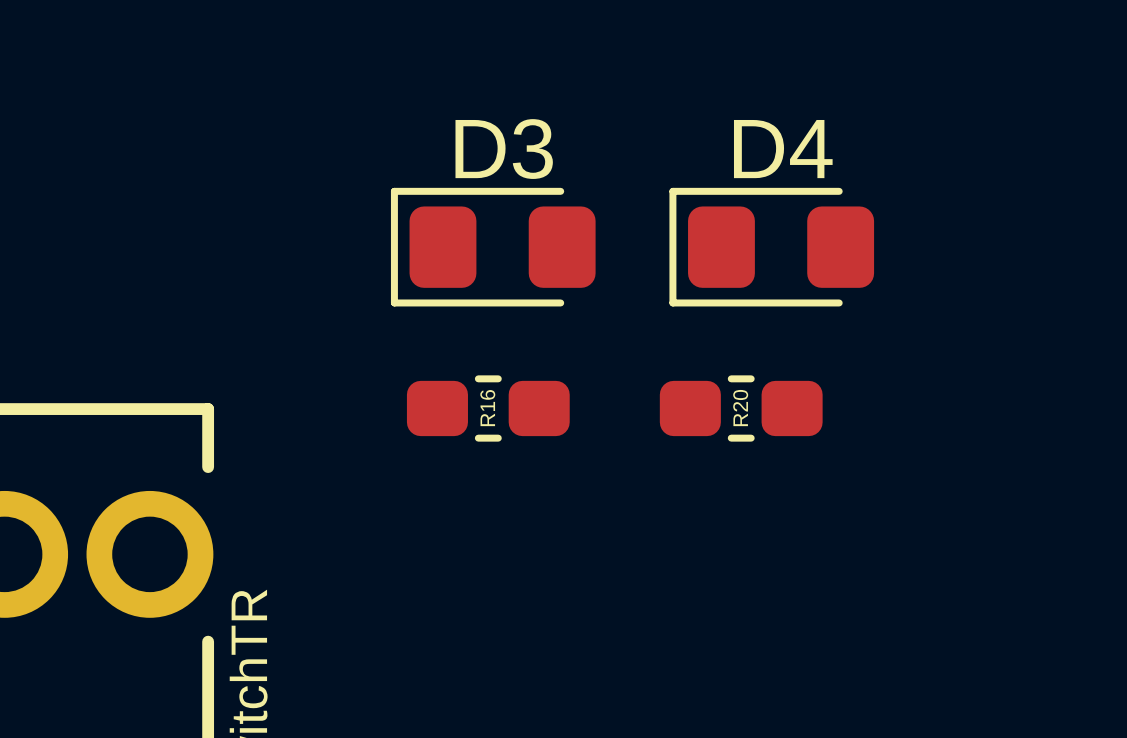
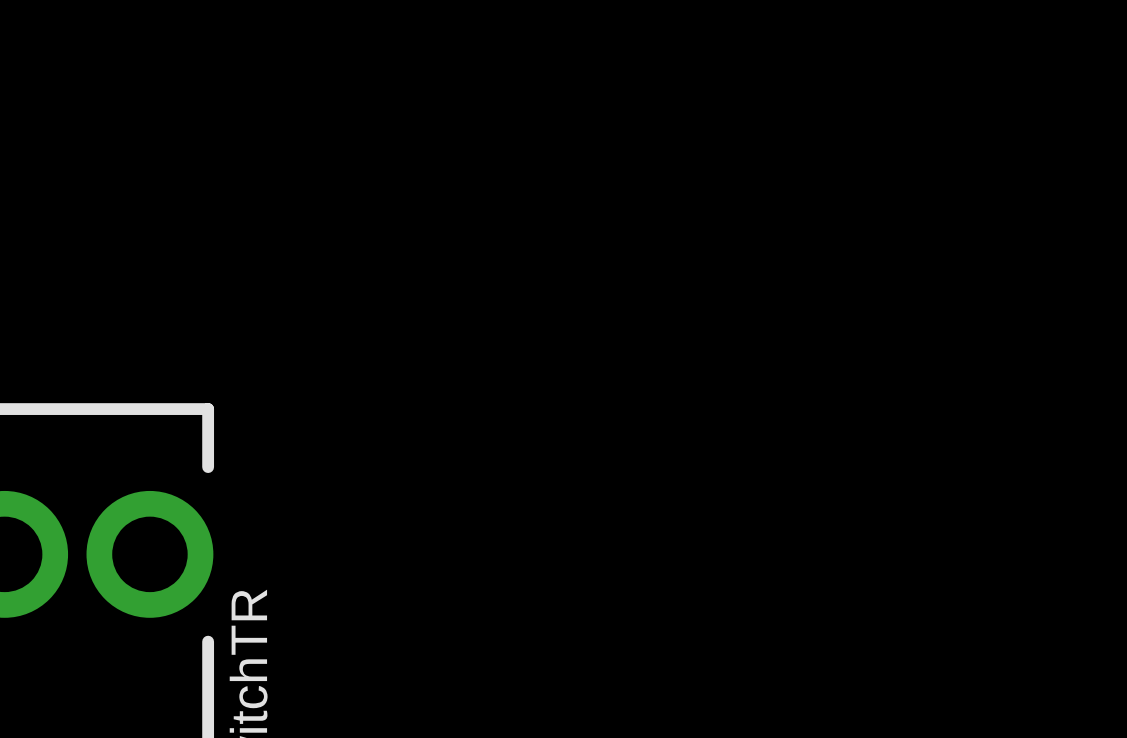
D3: (493, 247) -> none
D4: (771, 247) -> none
R16: (488, 408) -> none
R20: (741, 408) -> none

